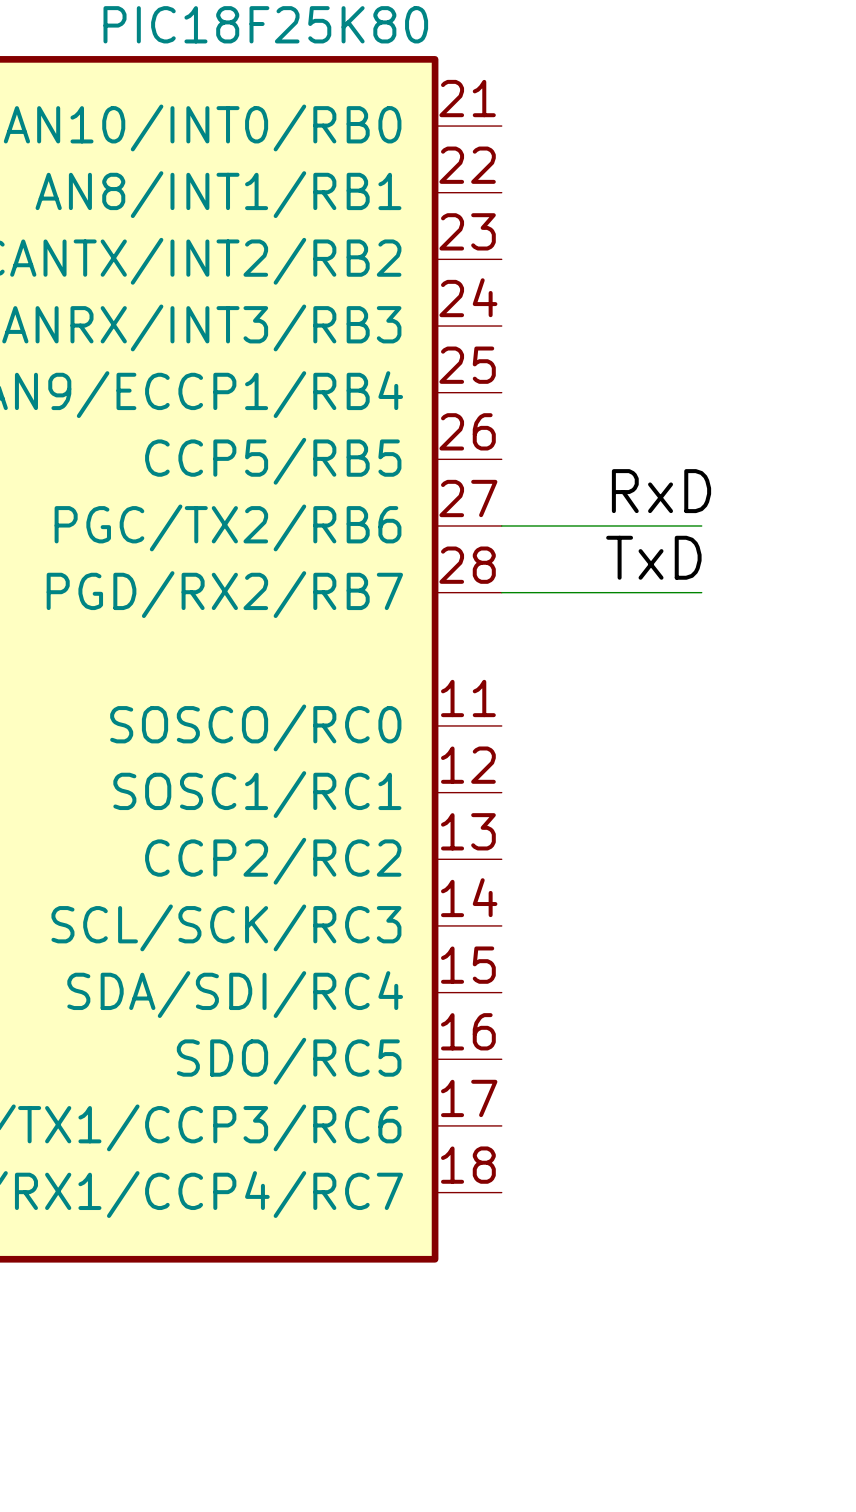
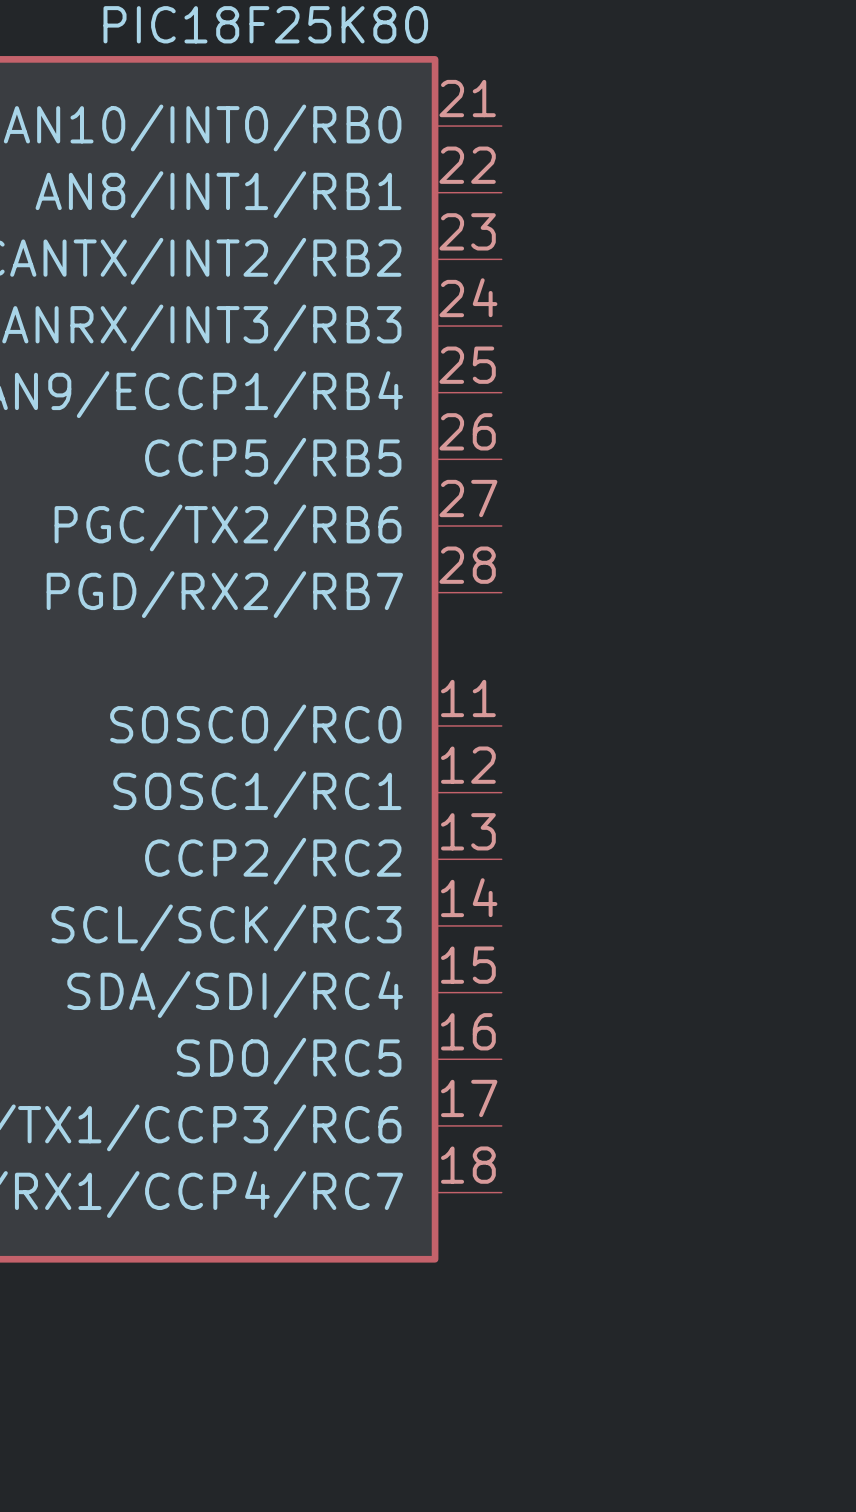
label: RxD (661, 491) -> none
wire: (501, 525) (701, 525) -> none
label: TxD (653, 557) -> none
wire: (501, 592) (701, 592) -> none

